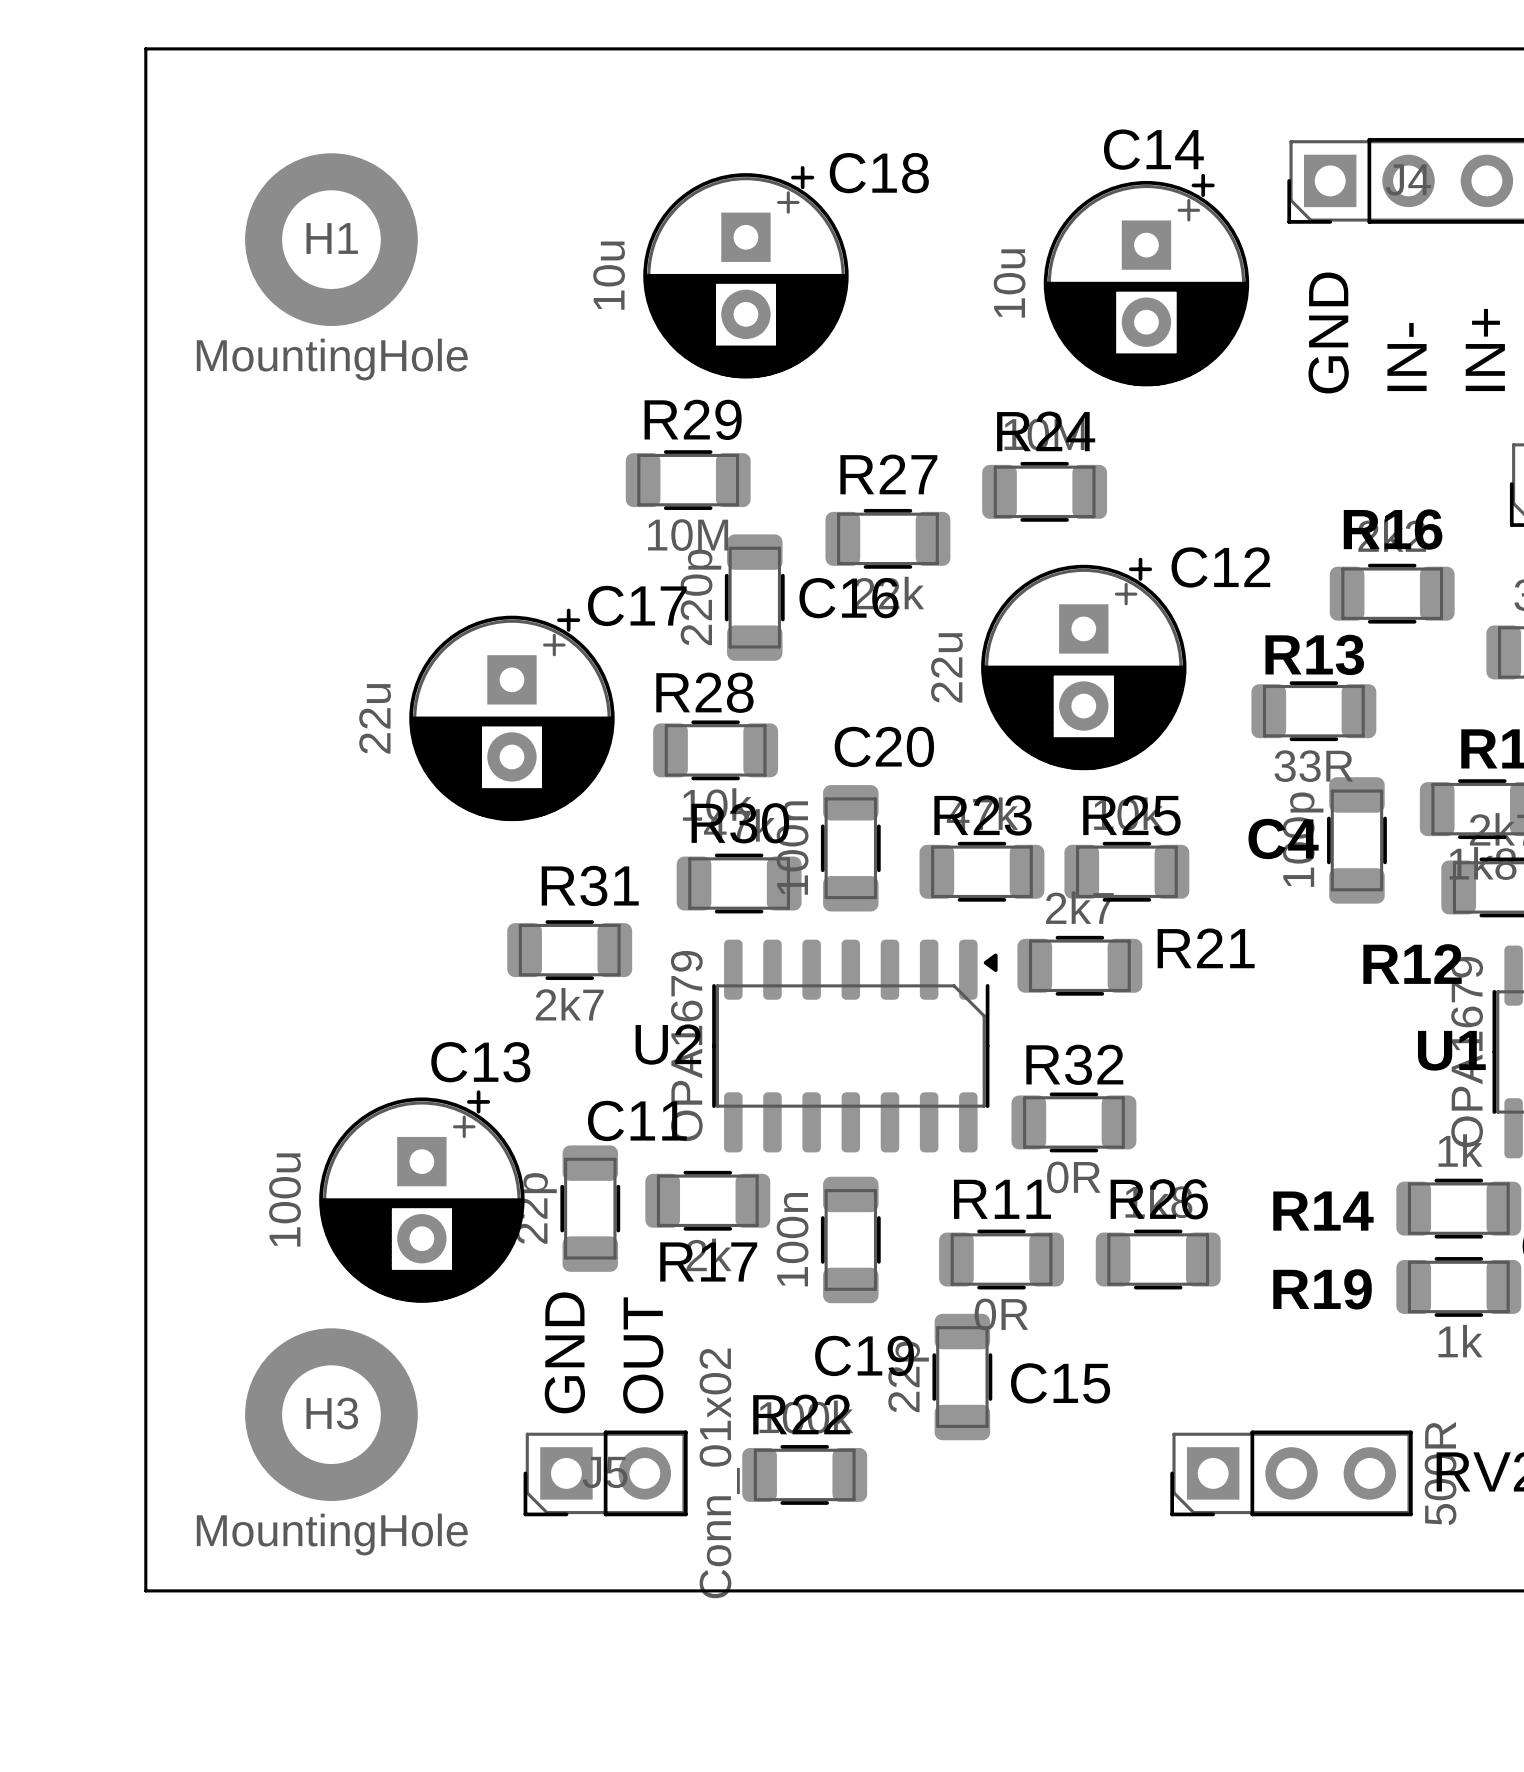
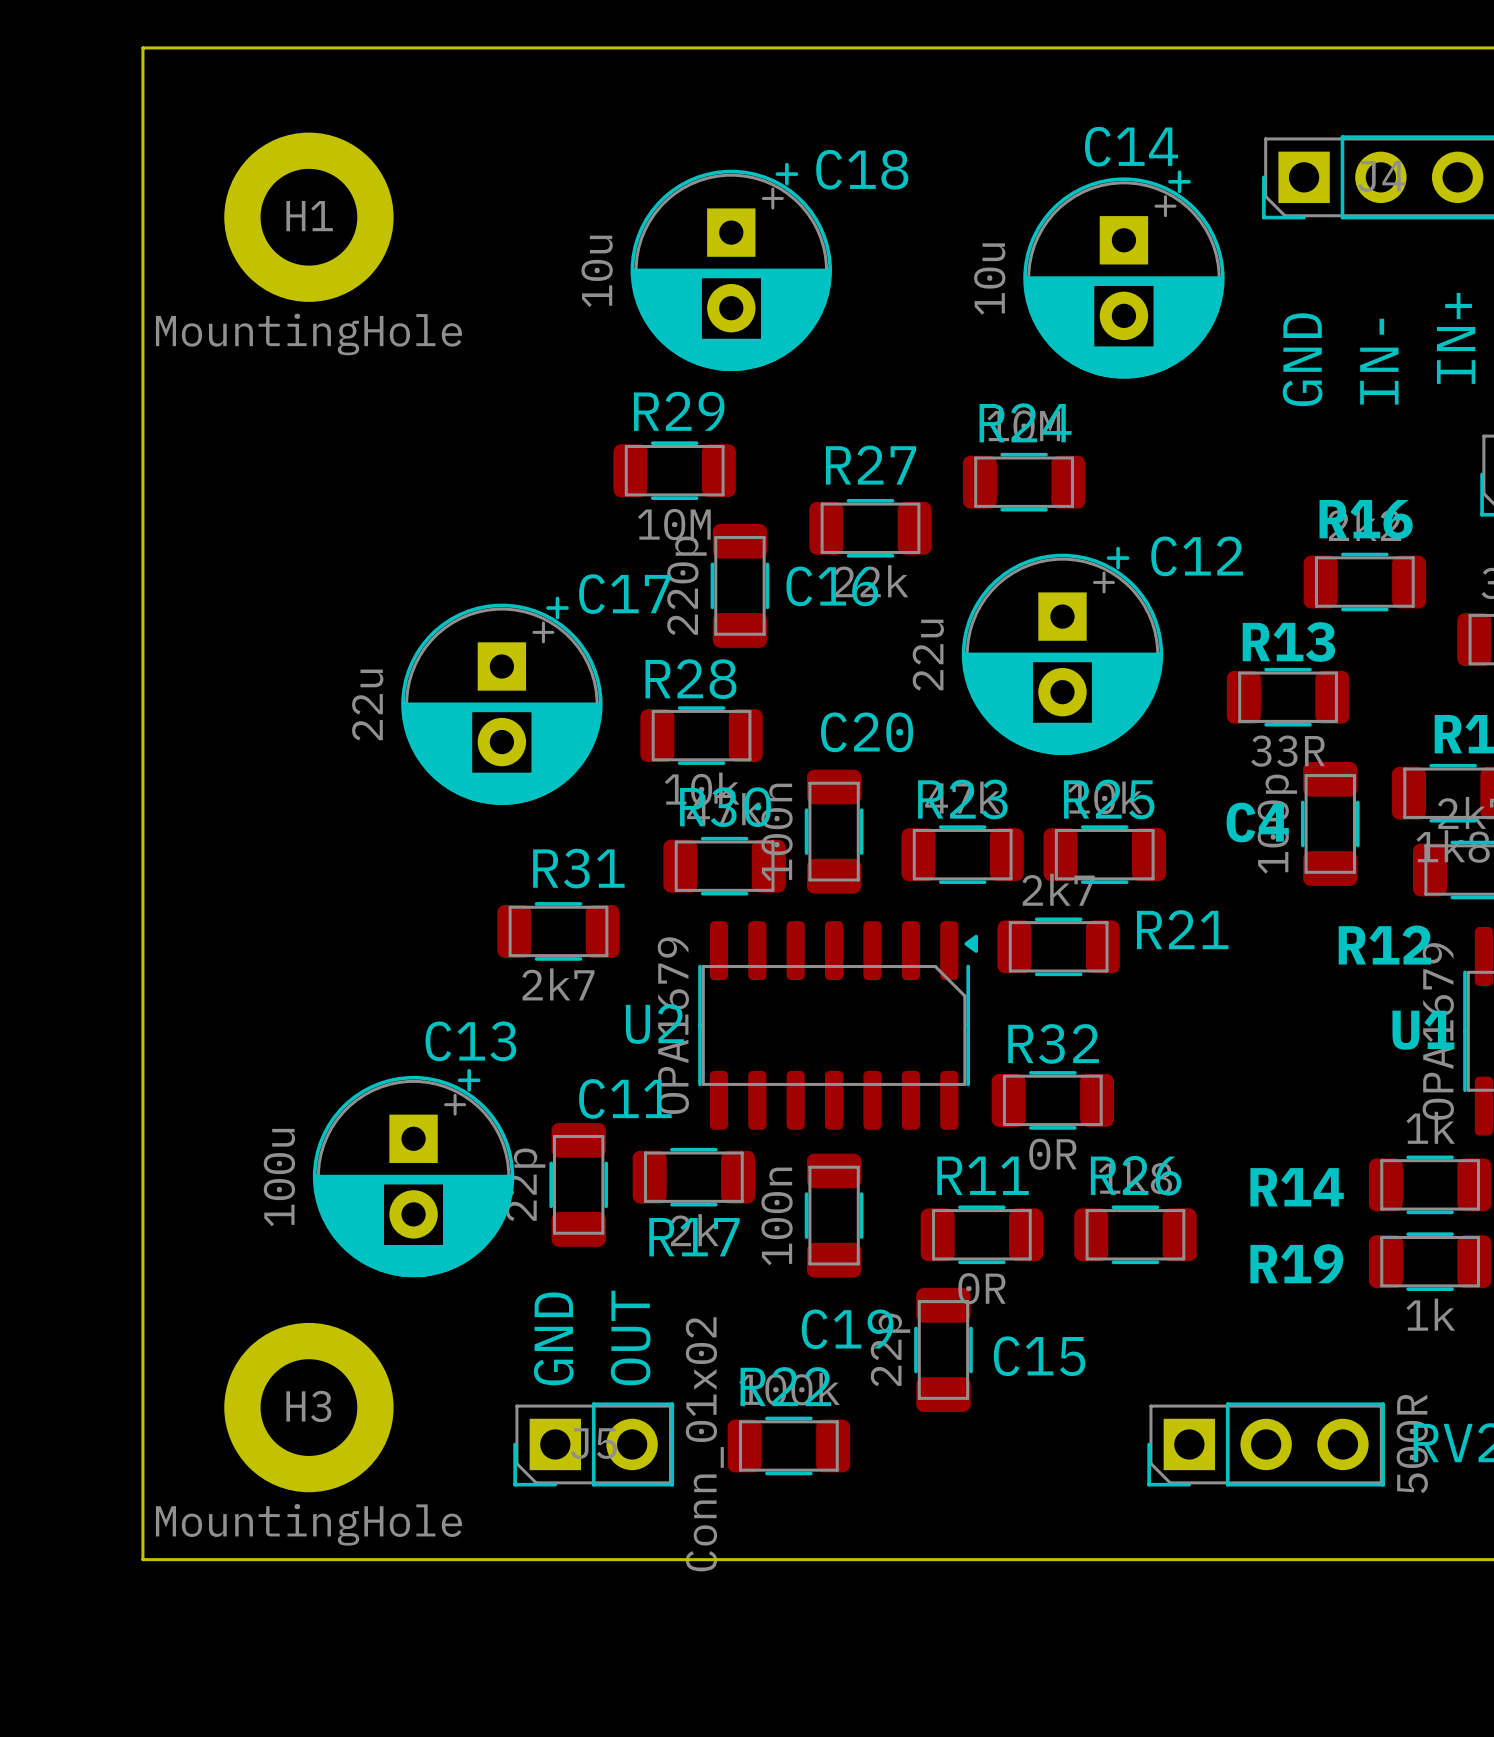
H1 position: (331, 239) -> (308, 217)
text position: GND (1328, 332) -> GND (1302, 359)
text position: IN- (1406, 357) -> IN- (1379, 361)
H3 position: (331, 1414) -> (308, 1407)

